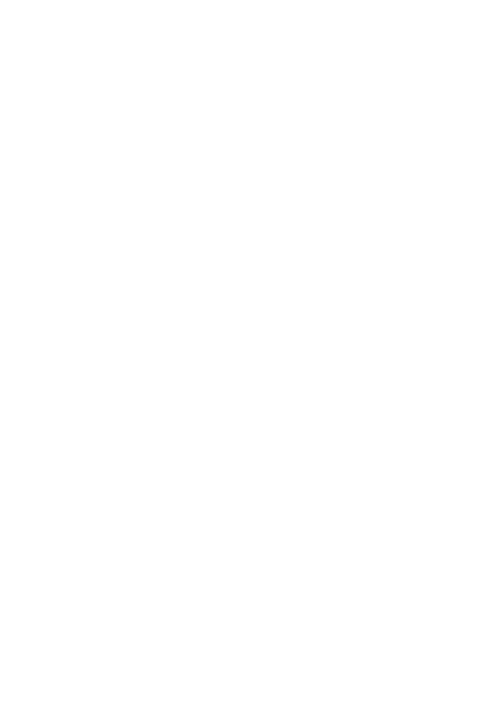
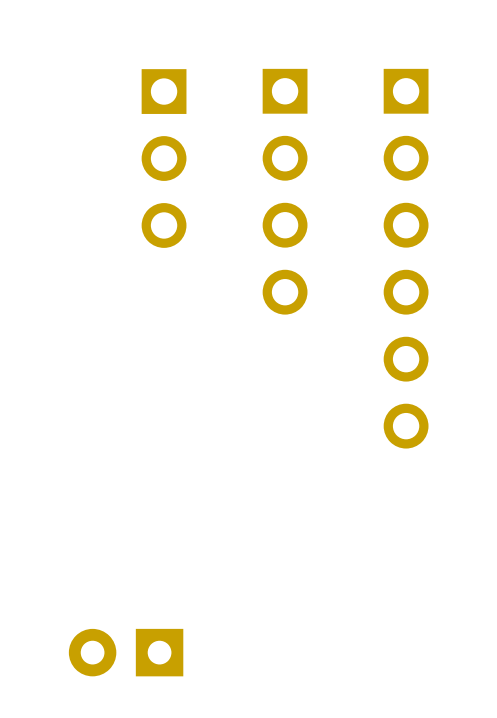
part: none -> (164, 158)
part: none -> (285, 191)
part: none -> (406, 258)
part: none -> (126, 652)

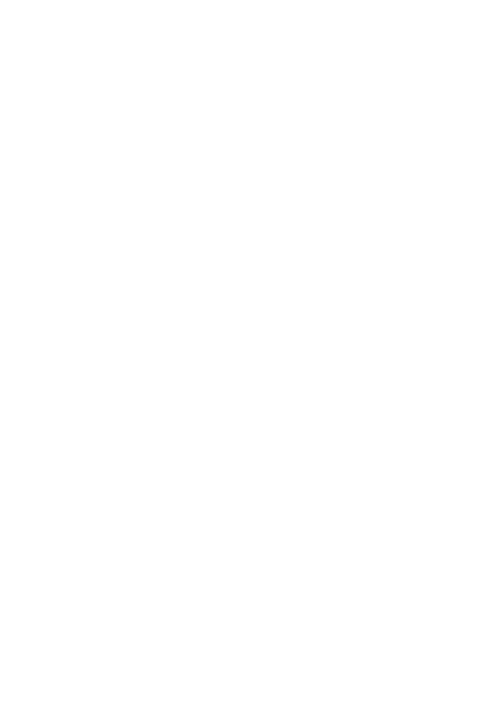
part: (164, 158) -> none
part: (285, 191) -> none
part: (406, 258) -> none
part: (126, 652) -> none

